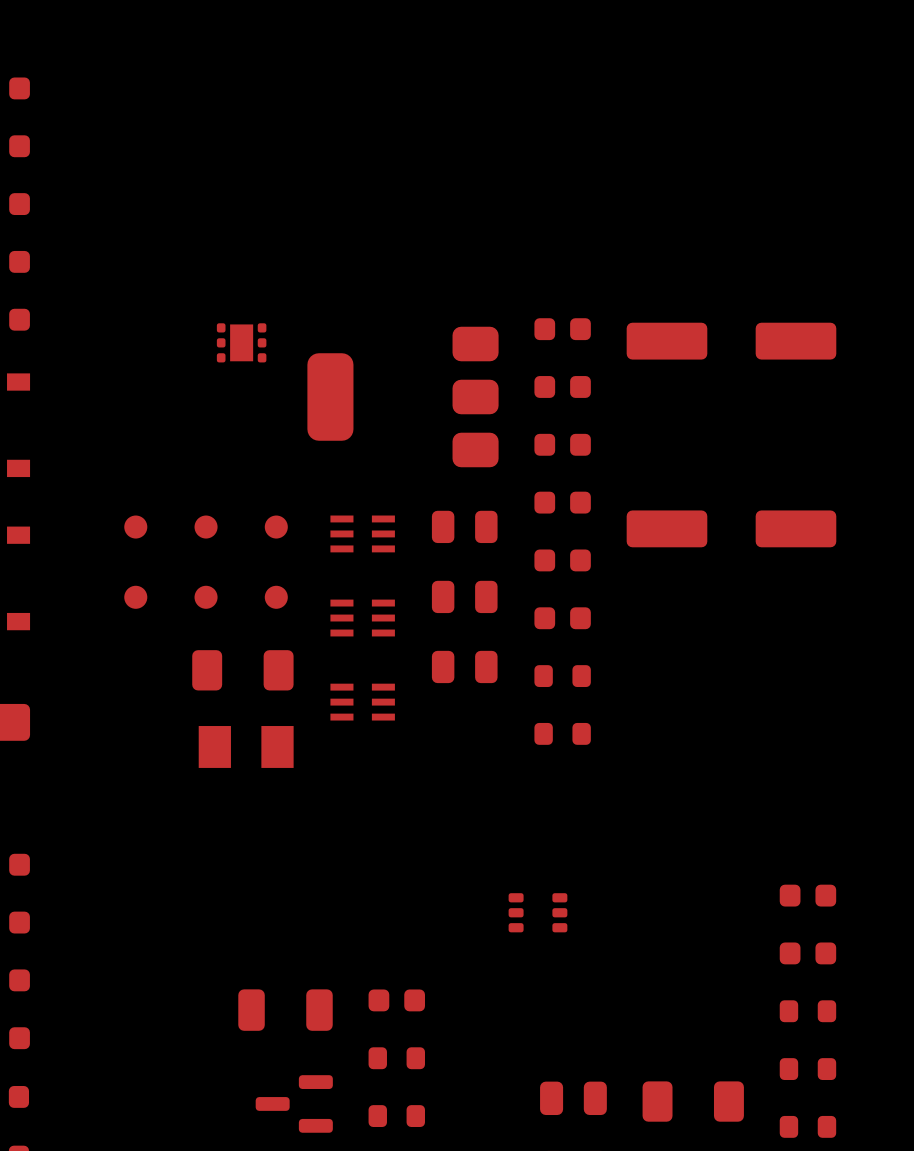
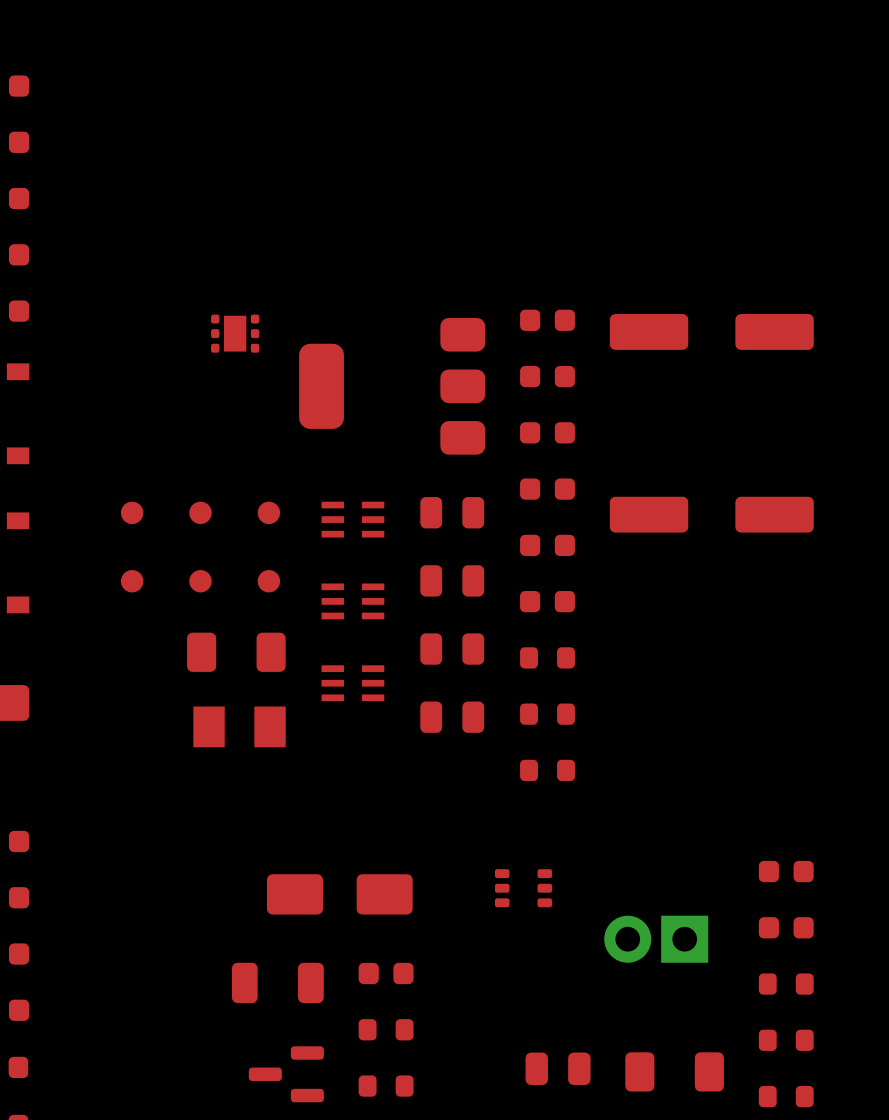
part: none -> (452, 717)
part: none -> (547, 770)
part: none -> (339, 894)
part: none -> (656, 939)

